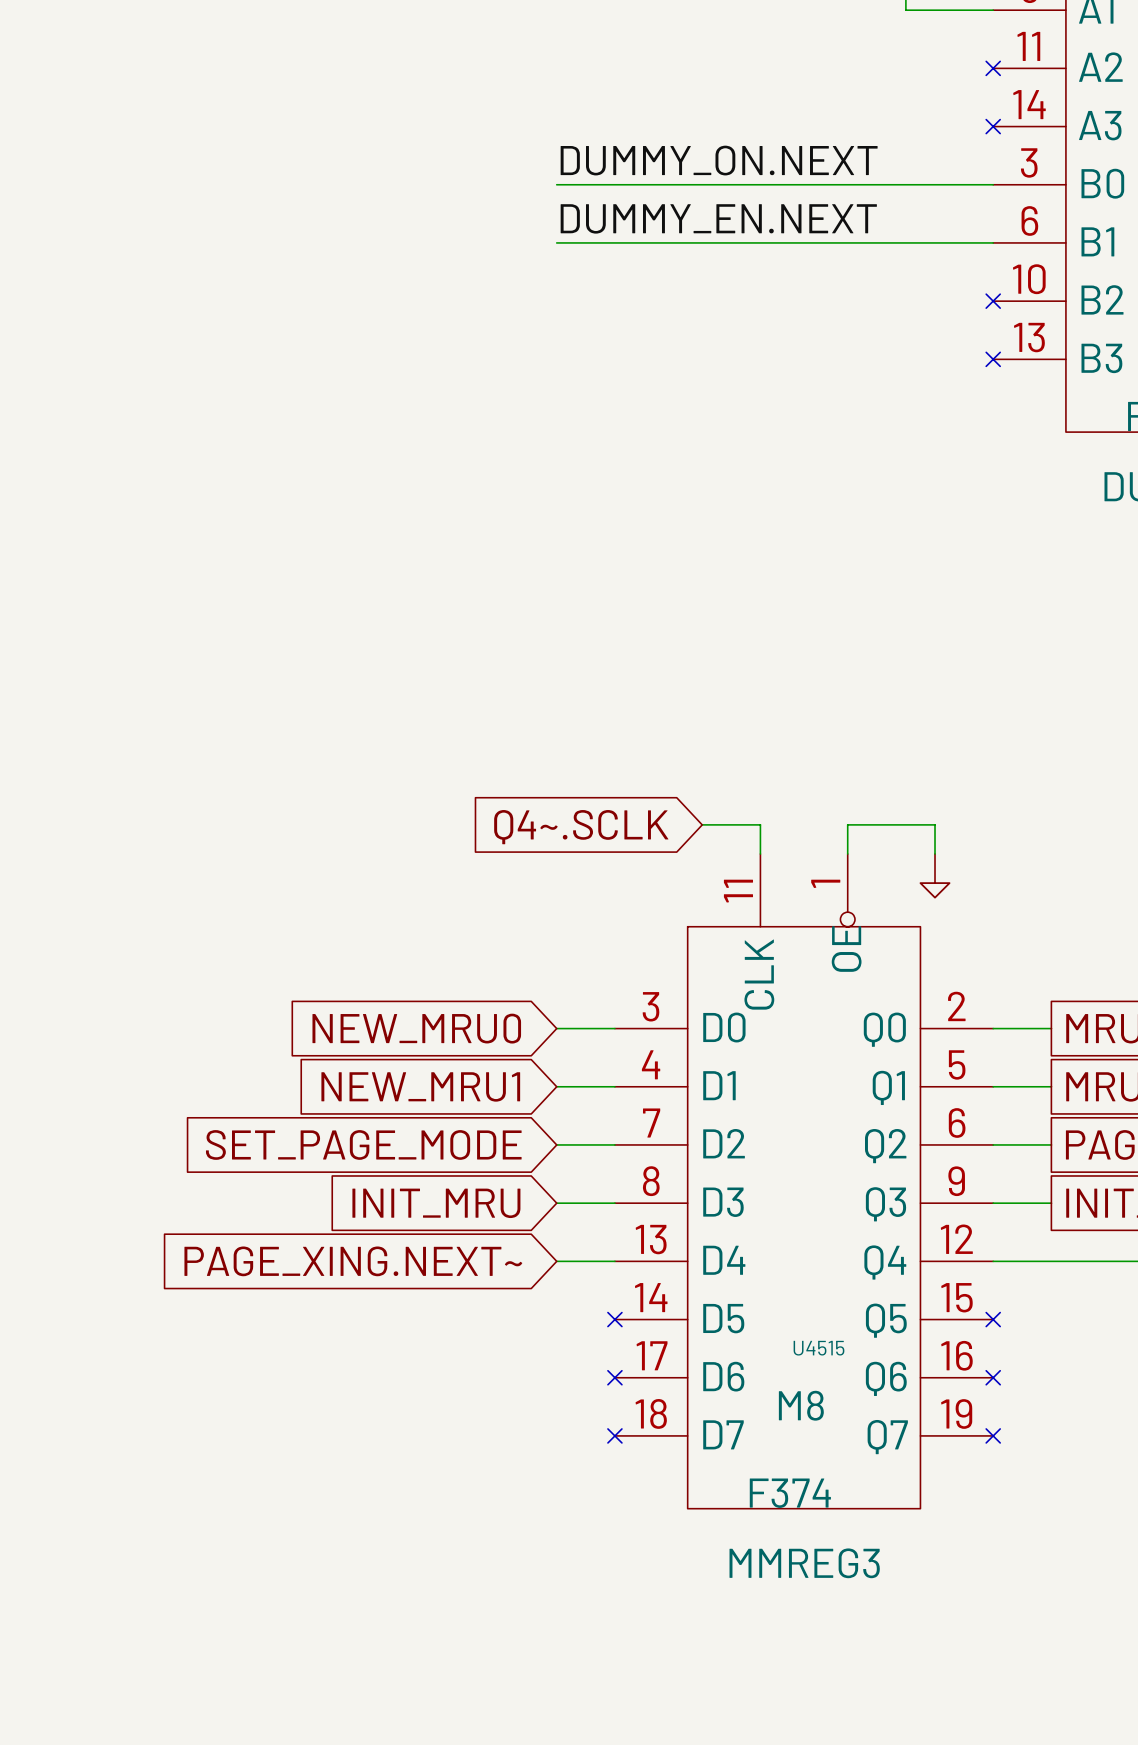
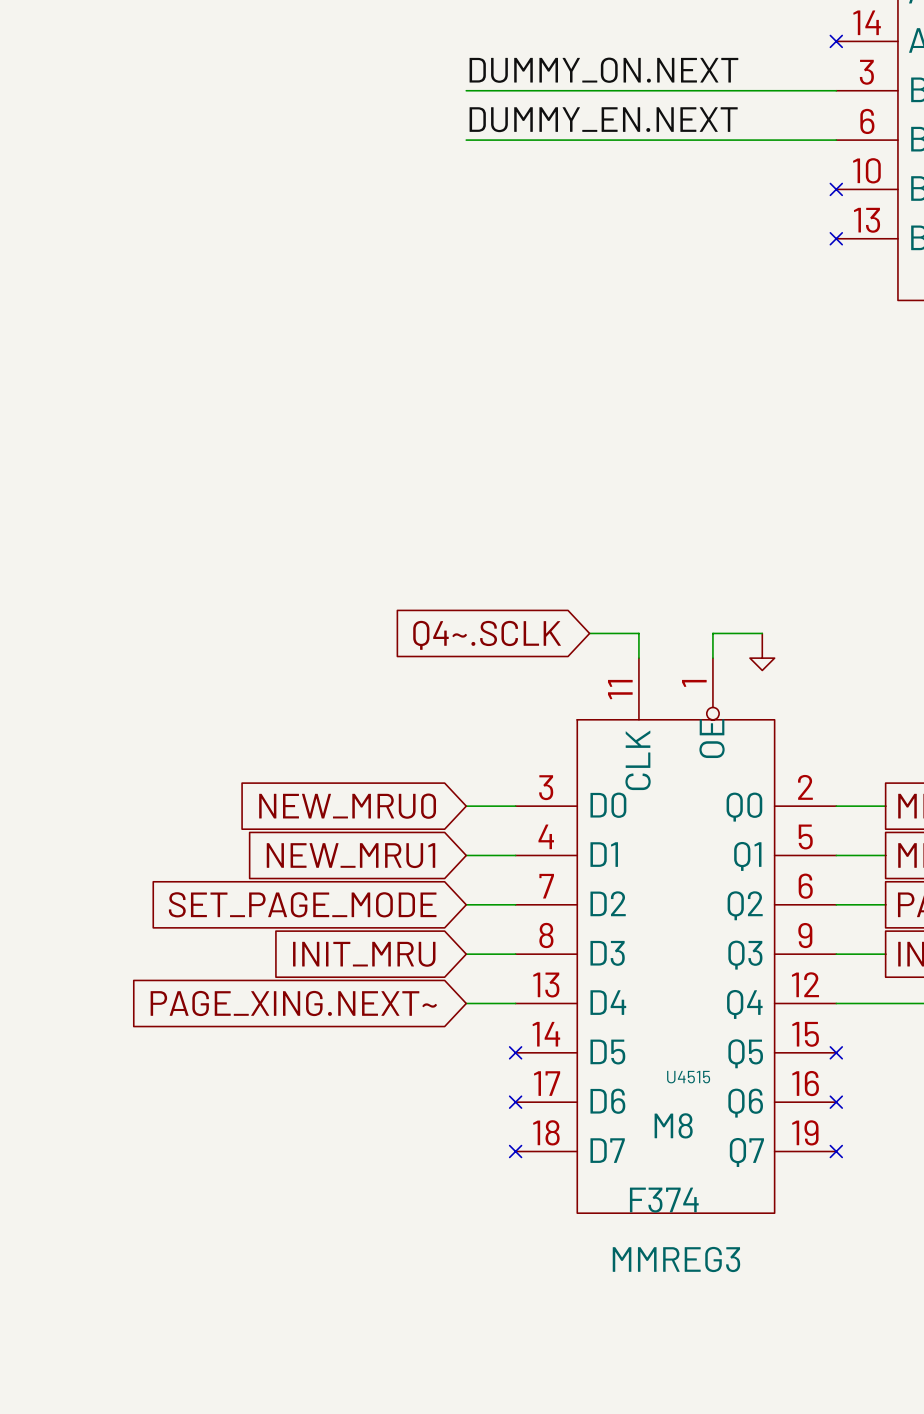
wire: (905, 824) (935, 824) (935, 854) -> none
power symbol position: (935, 876) -> (762, 652)

